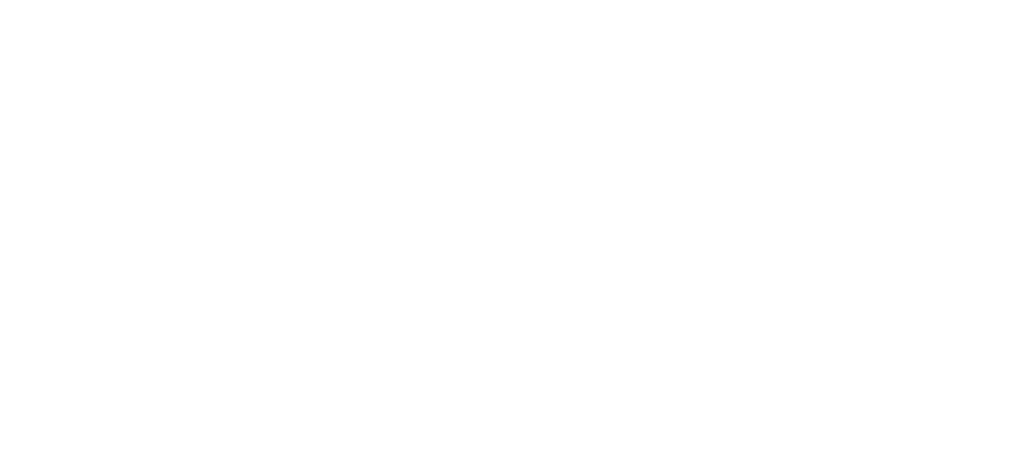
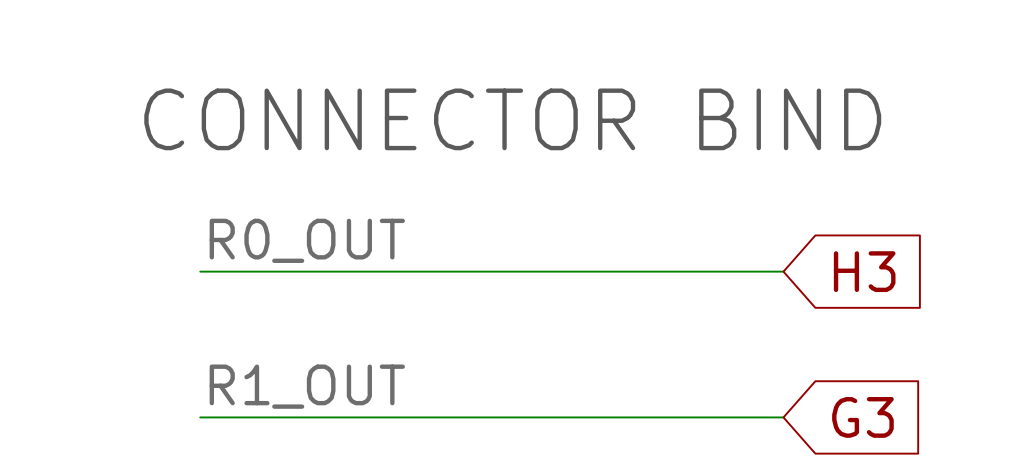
text: none -> CONNECTOR BIND (512, 119)
label: none -> R0_OUT (307, 240)
wire: none -> (200, 271) (783, 271)
global label: none -> H3 (864, 271)
label: none -> R1_OUT (307, 386)
wire: none -> (200, 417) (783, 417)
global label: none -> G3 (862, 417)

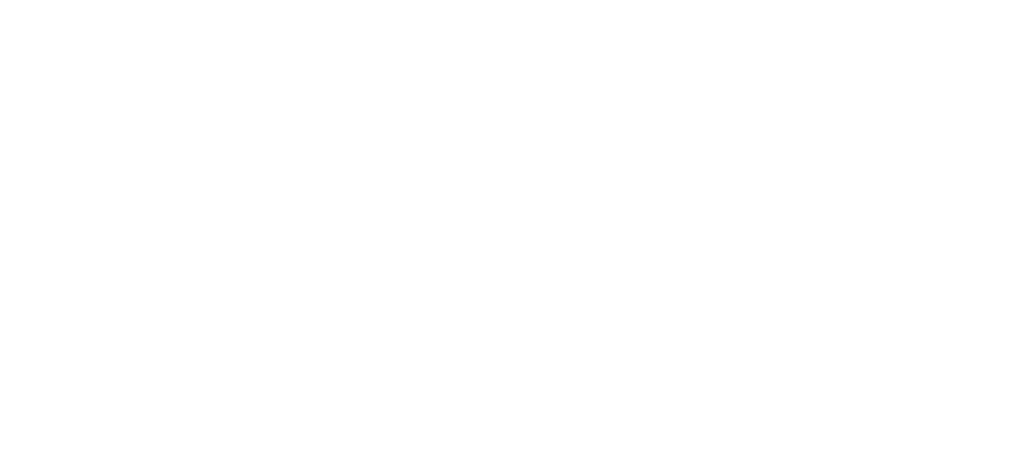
text: CONNECTOR BIND (512, 119) -> none
label: R0_OUT (307, 240) -> none
wire: (200, 271) (783, 271) -> none
global label: H3 (864, 271) -> none
label: R1_OUT (307, 386) -> none
wire: (200, 417) (783, 417) -> none
global label: G3 (862, 417) -> none

